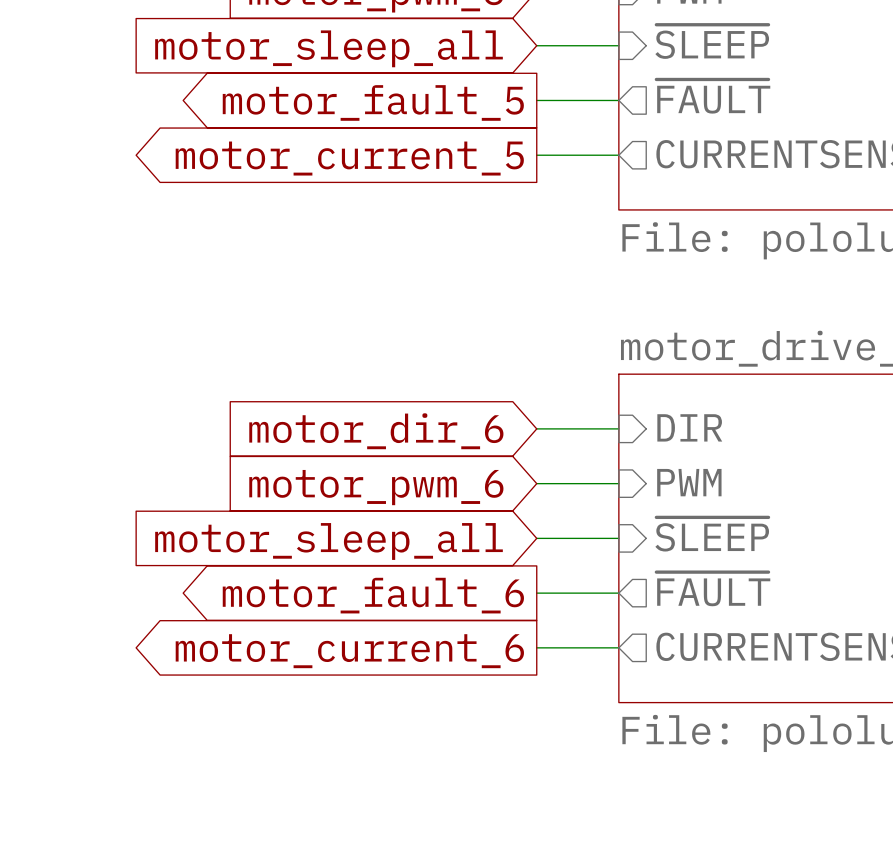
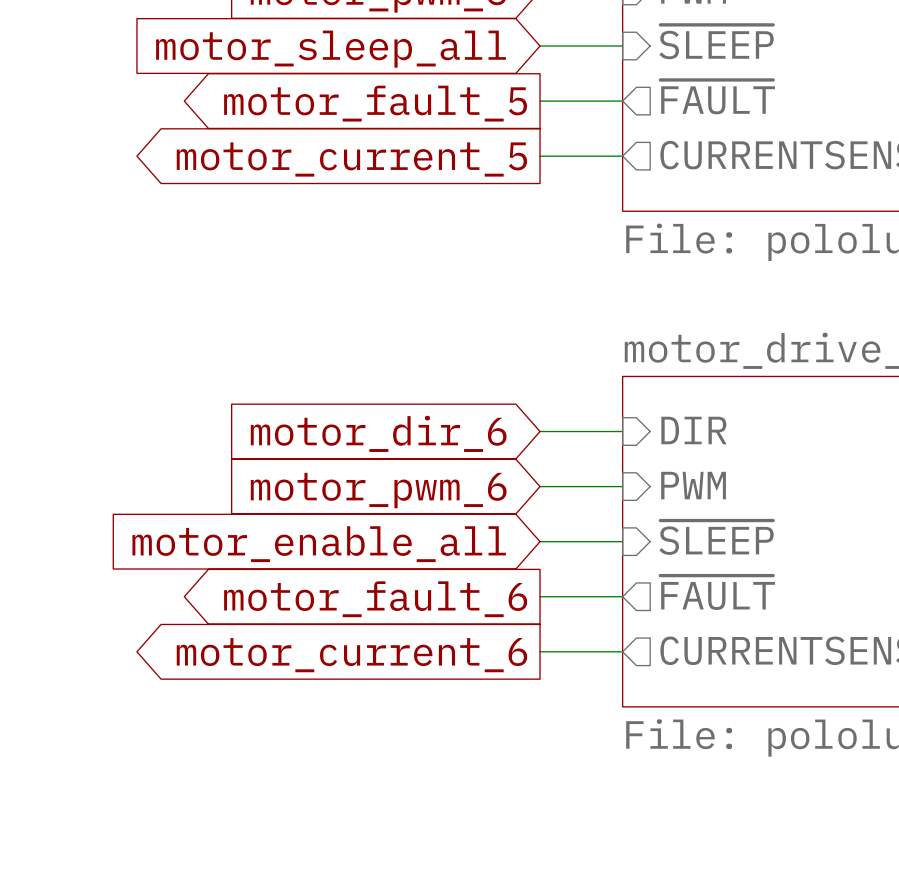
global label: motor_sleep_all (329, 541) -> motor_enable_all (319, 544)

